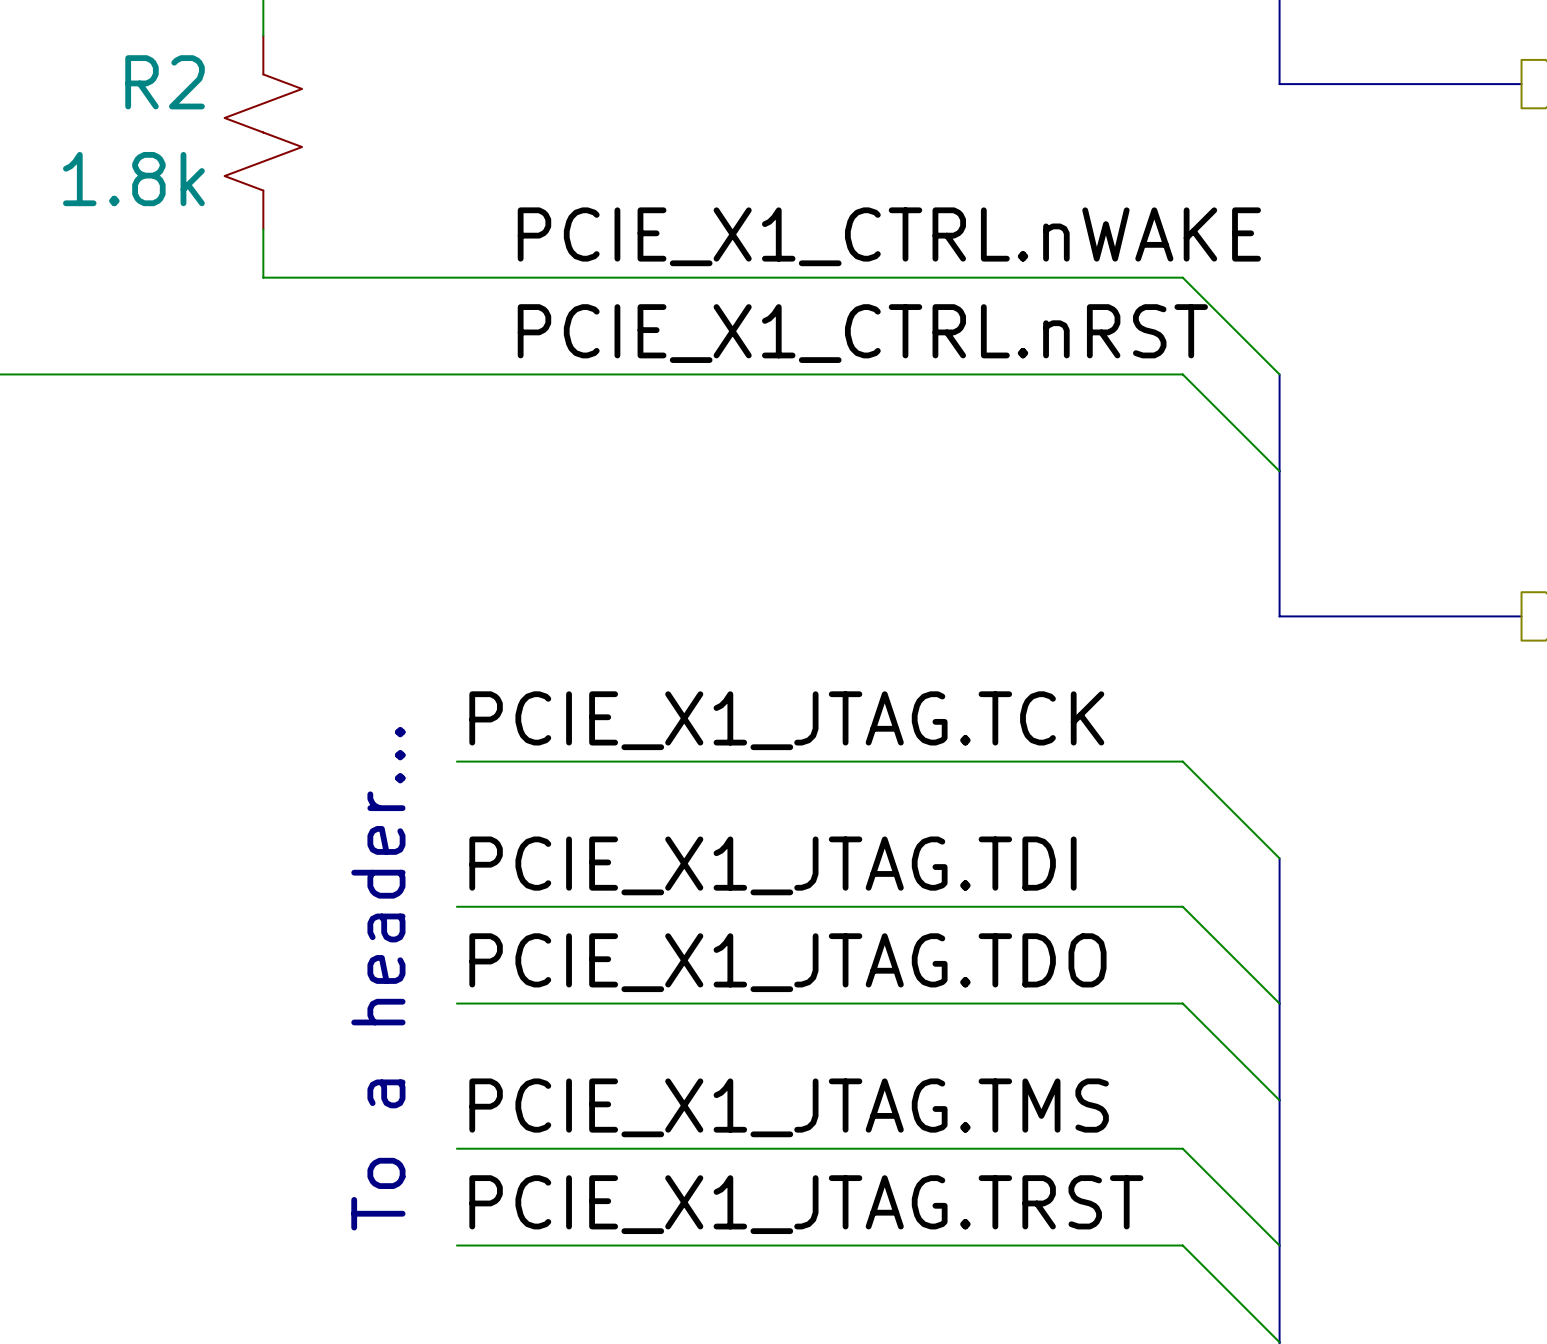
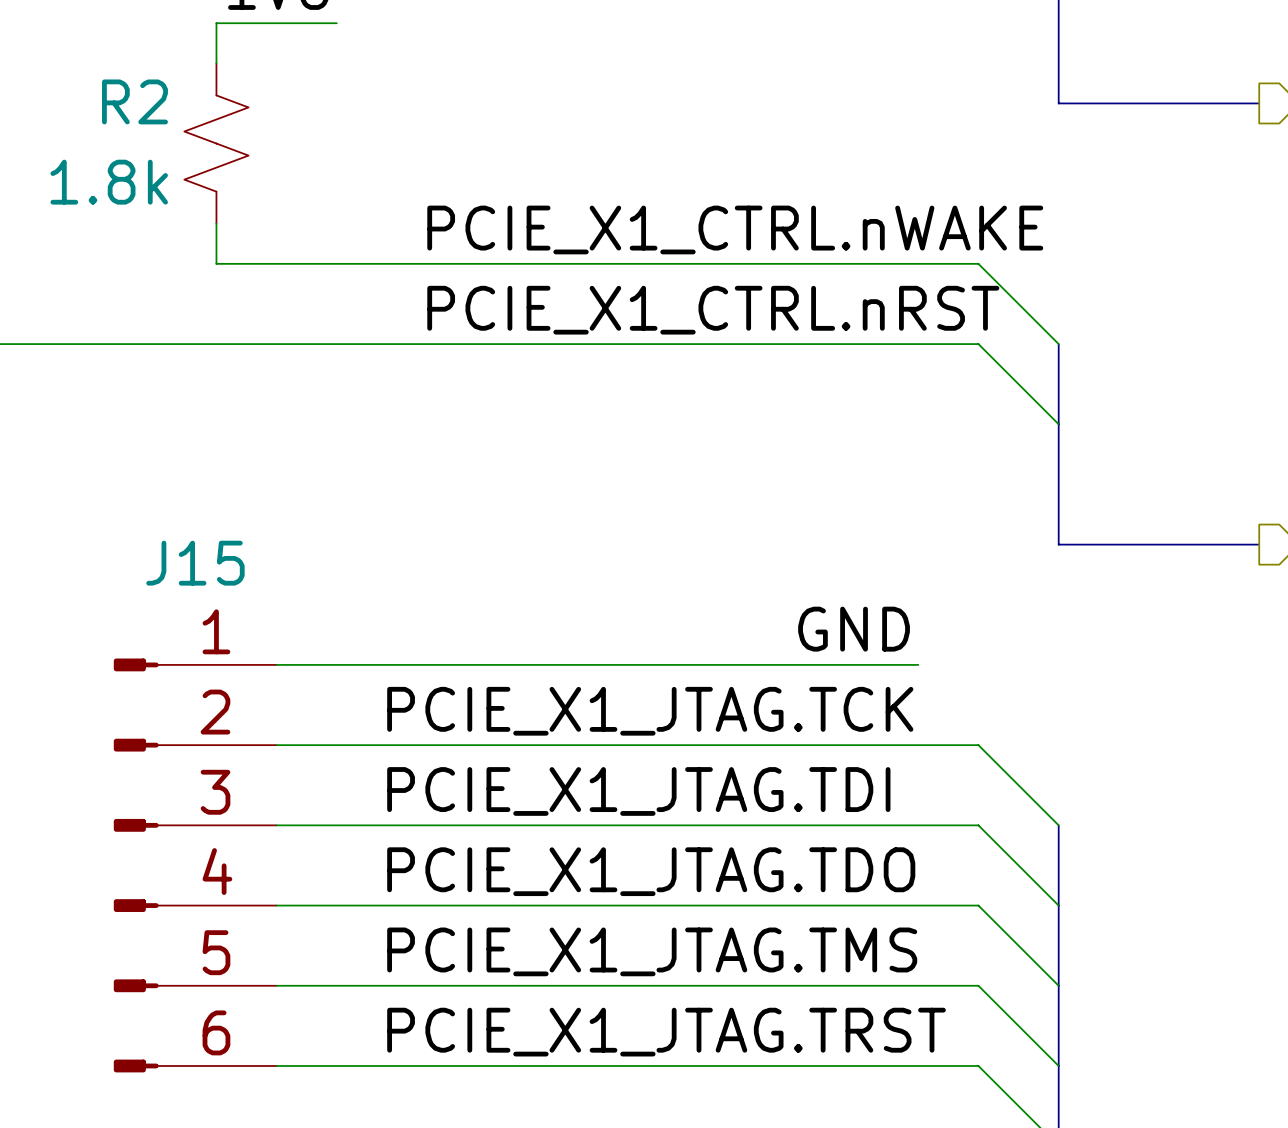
label: none -> GND (854, 629)
label position: PCIE_X1_JTAG.TCK (786, 720) -> PCIE_X1_JTAG.TCK (650, 711)
wire: none -> (276, 664) (376, 664)
wire: (1110, 761) (1182, 761) (1279, 858) -> none
wire: none -> (276, 745) (978, 745) (1058, 825)
bus: (1279, 858) (1279, 955) -> none
label position: PCIE_X1_JTAG.TDI (772, 865) -> PCIE_X1_JTAG.TDI (638, 791)
wire: (456, 906) (1182, 906) (1279, 1003) -> none
wire: none -> (276, 825) (978, 825) (1058, 905)
label position: PCIE_X1_JTAG.TDO (787, 962) -> PCIE_X1_JTAG.TDO (651, 871)
text: To a header... (378, 978) -> none
J15: none -> (195, 865)
wire: (456, 1003) (1182, 1003) (1279, 1100) -> none
wire: none -> (276, 905) (978, 905) (1058, 985)
wire: none -> (276, 985) (376, 985)
wire: none -> (276, 1065) (376, 1065)

